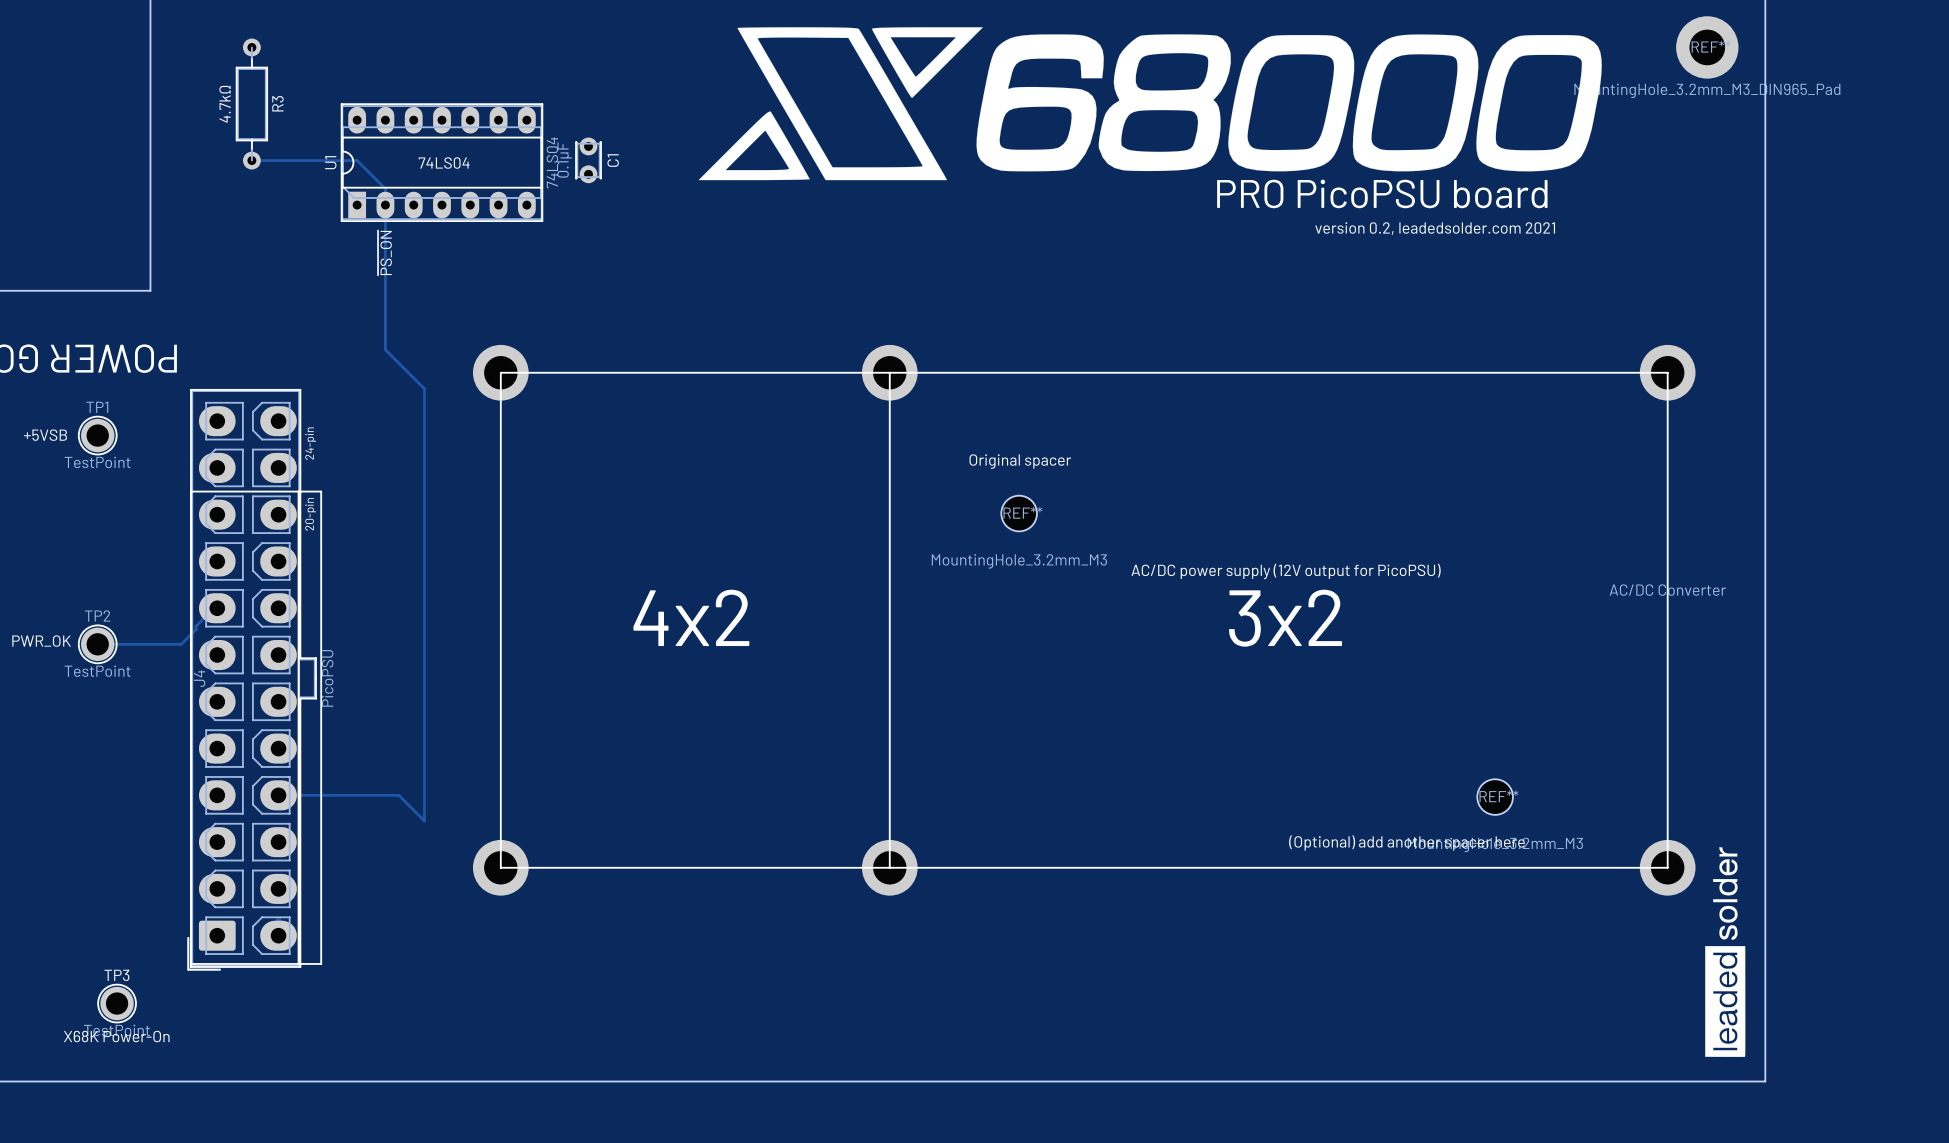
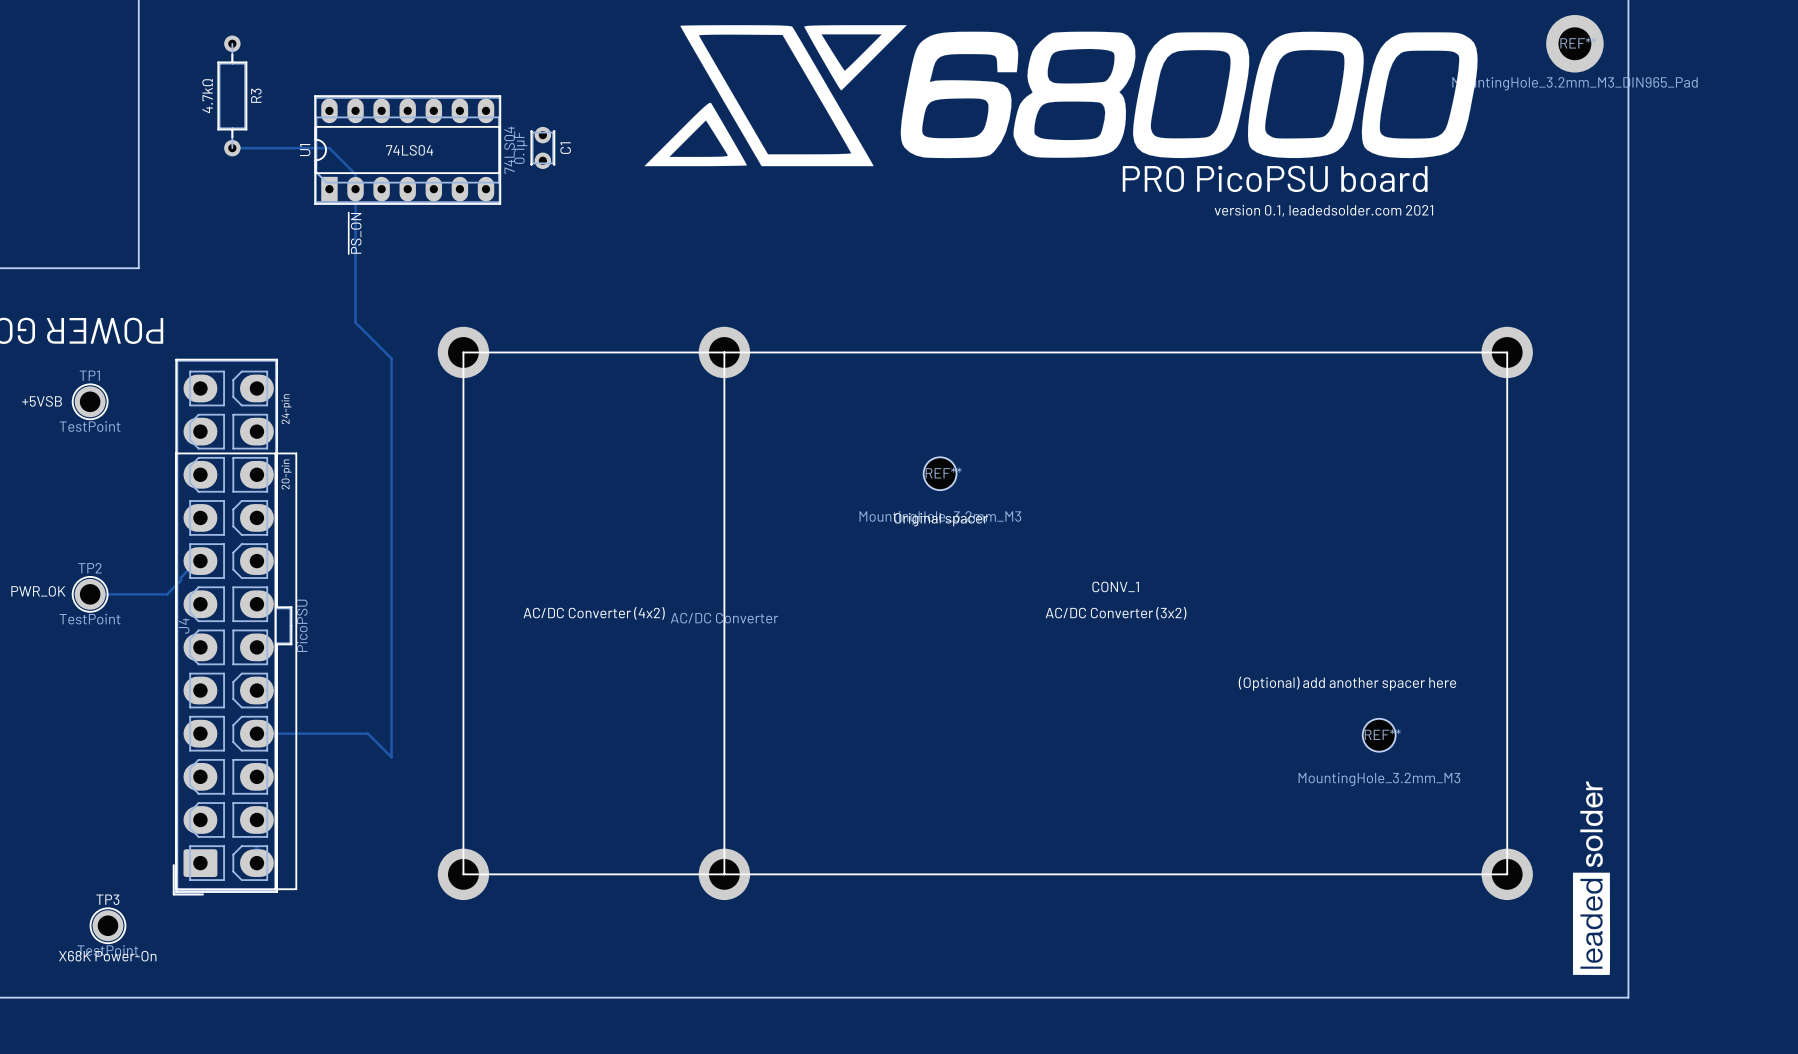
text: version 0.2, leadedsolder.com 2021 (1435, 228) -> version 0.1, leadedsolder.com 2021 (1323, 210)
text position: Original spacer (1020, 461) -> Original spacer (941, 519)
part: AC/DC Converter (1084, 620) -> none
CONV_1: none -> AC/DC Converter (985, 613)
text position: (Optional) add another spacer here (1406, 842) -> (Optional) add another spacer here (1347, 683)

